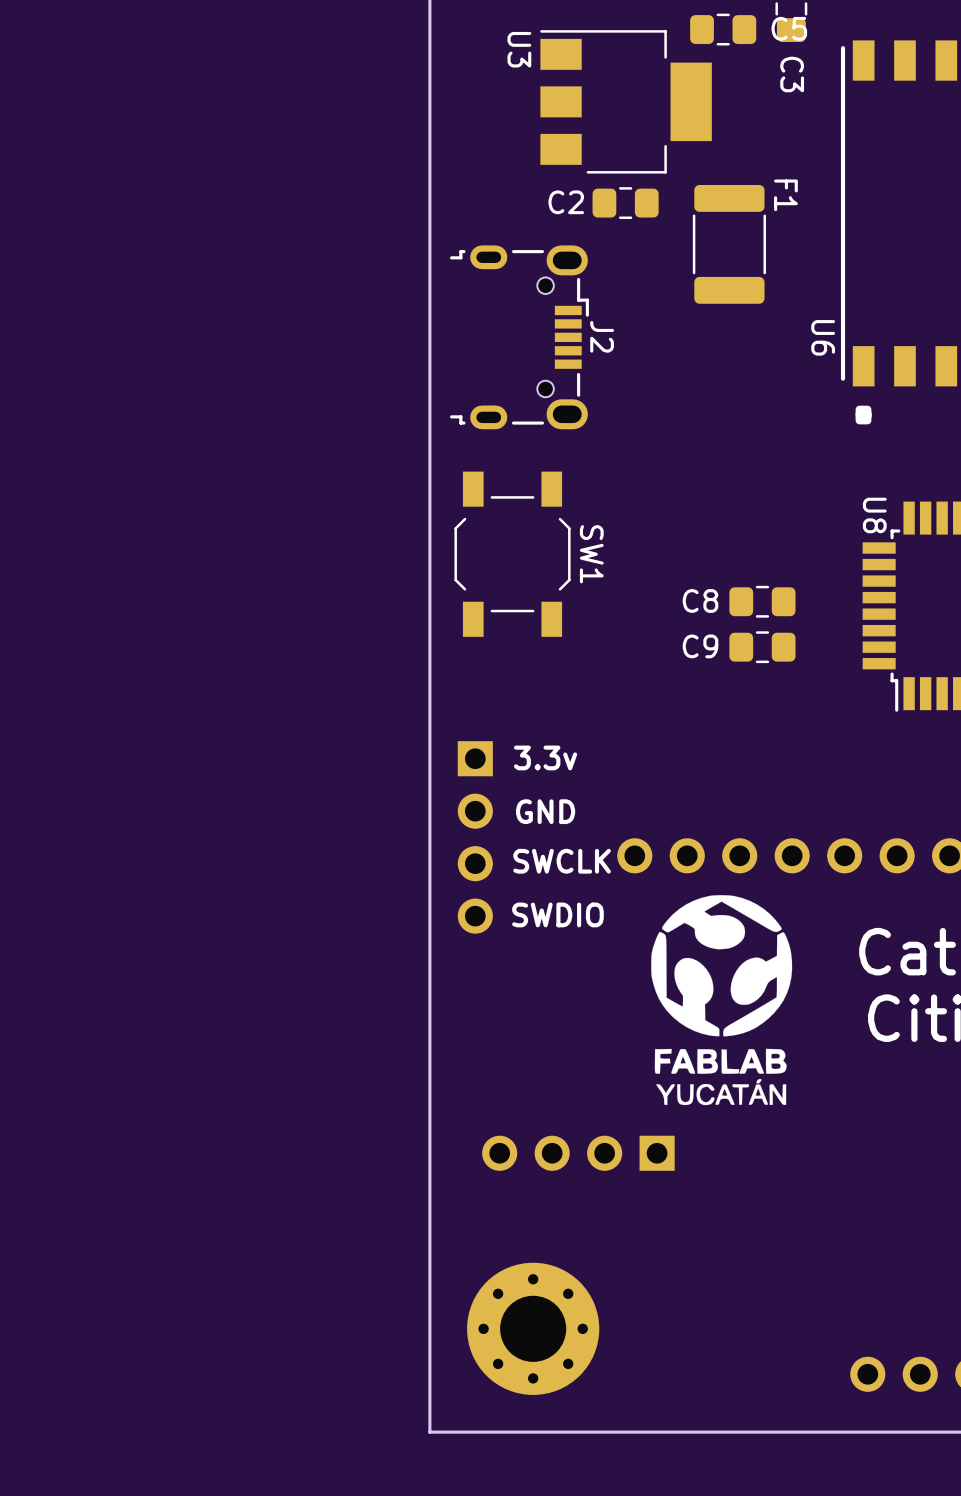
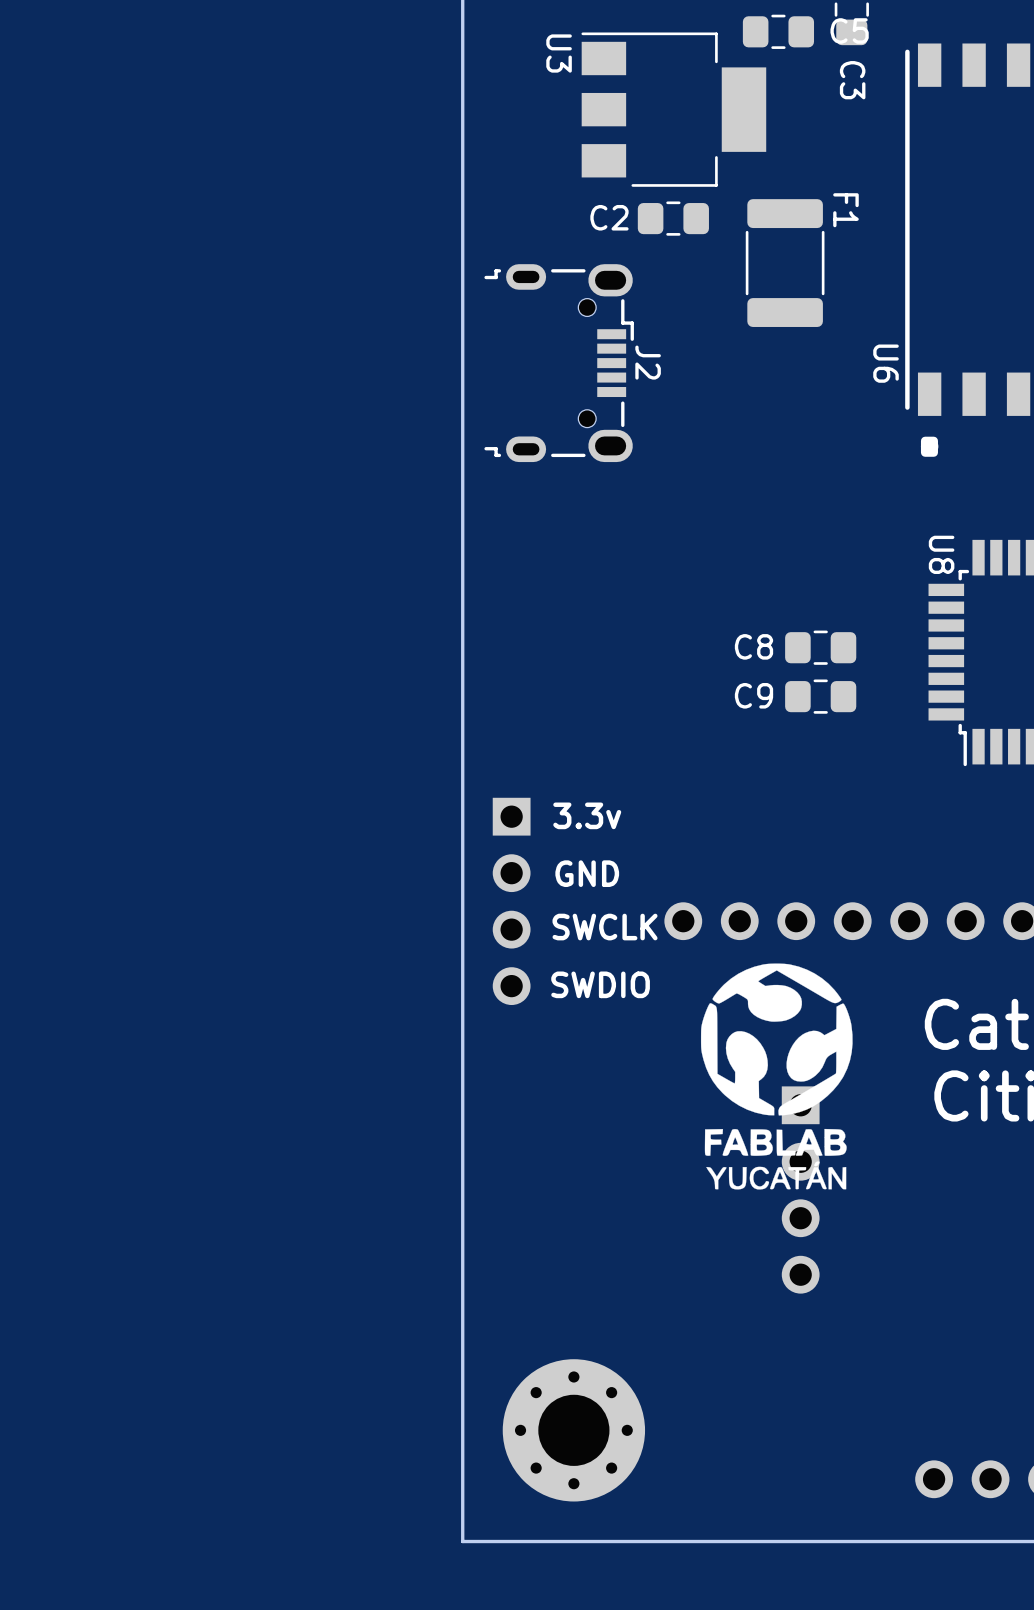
SW1: (512, 554) -> none
part rotation: 0° (578, 1153) -> 90° counterclockwise (800, 1190)
part position: (578, 1153) -> (800, 1190)

